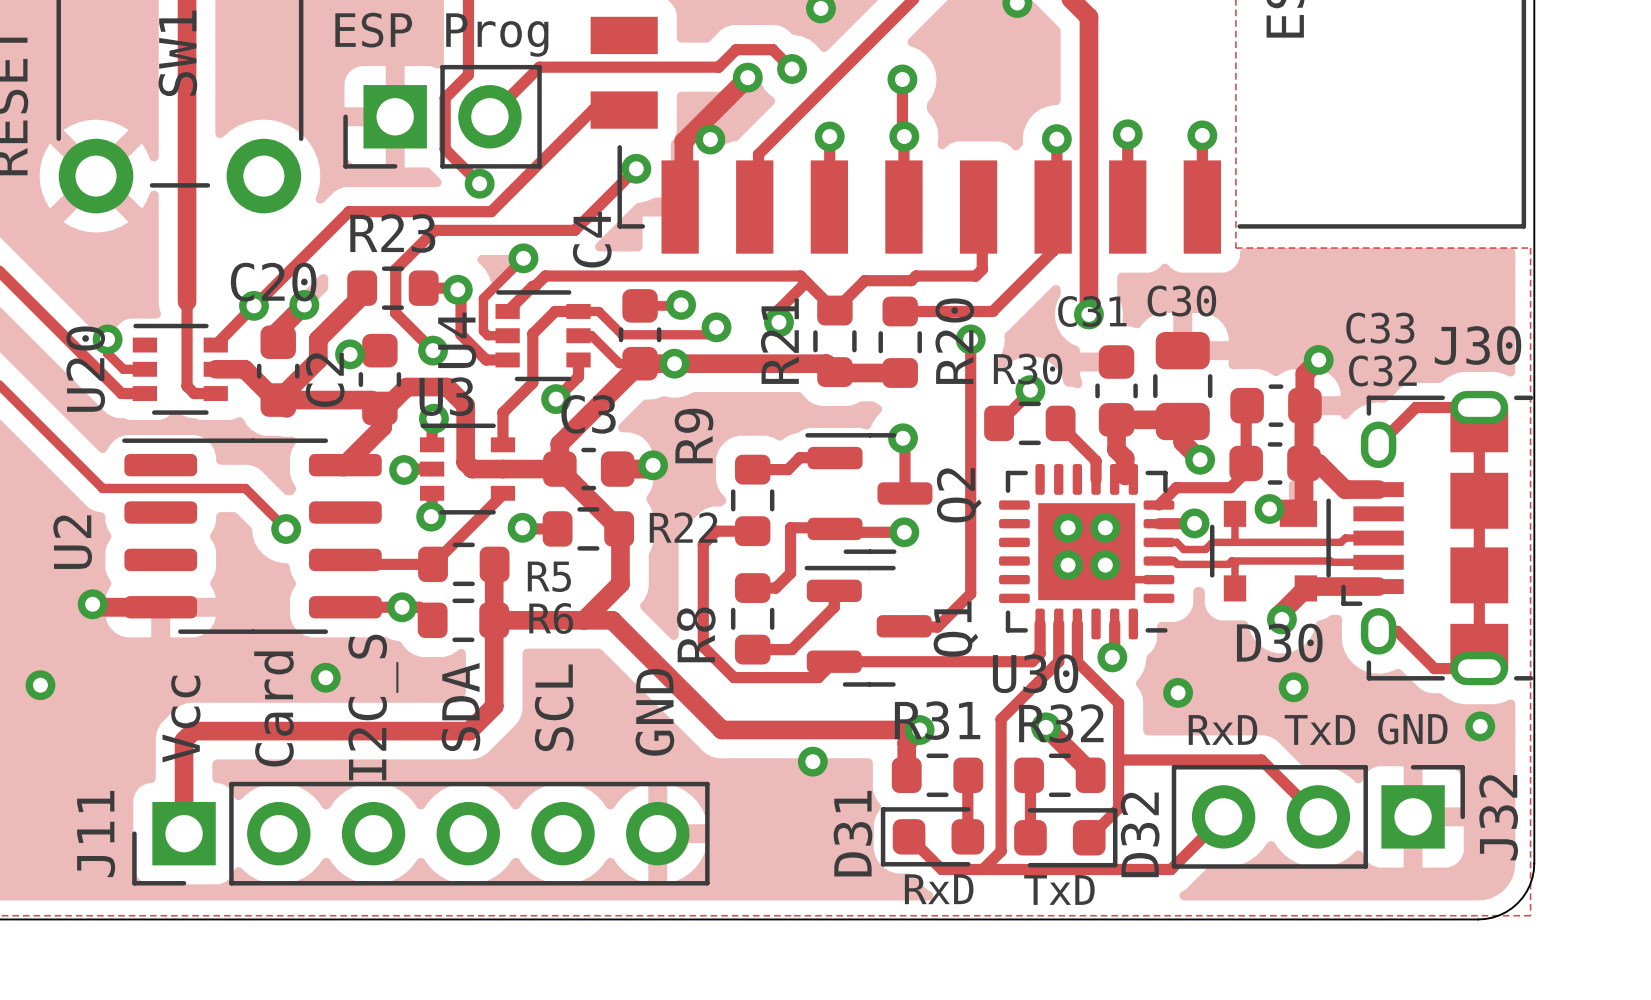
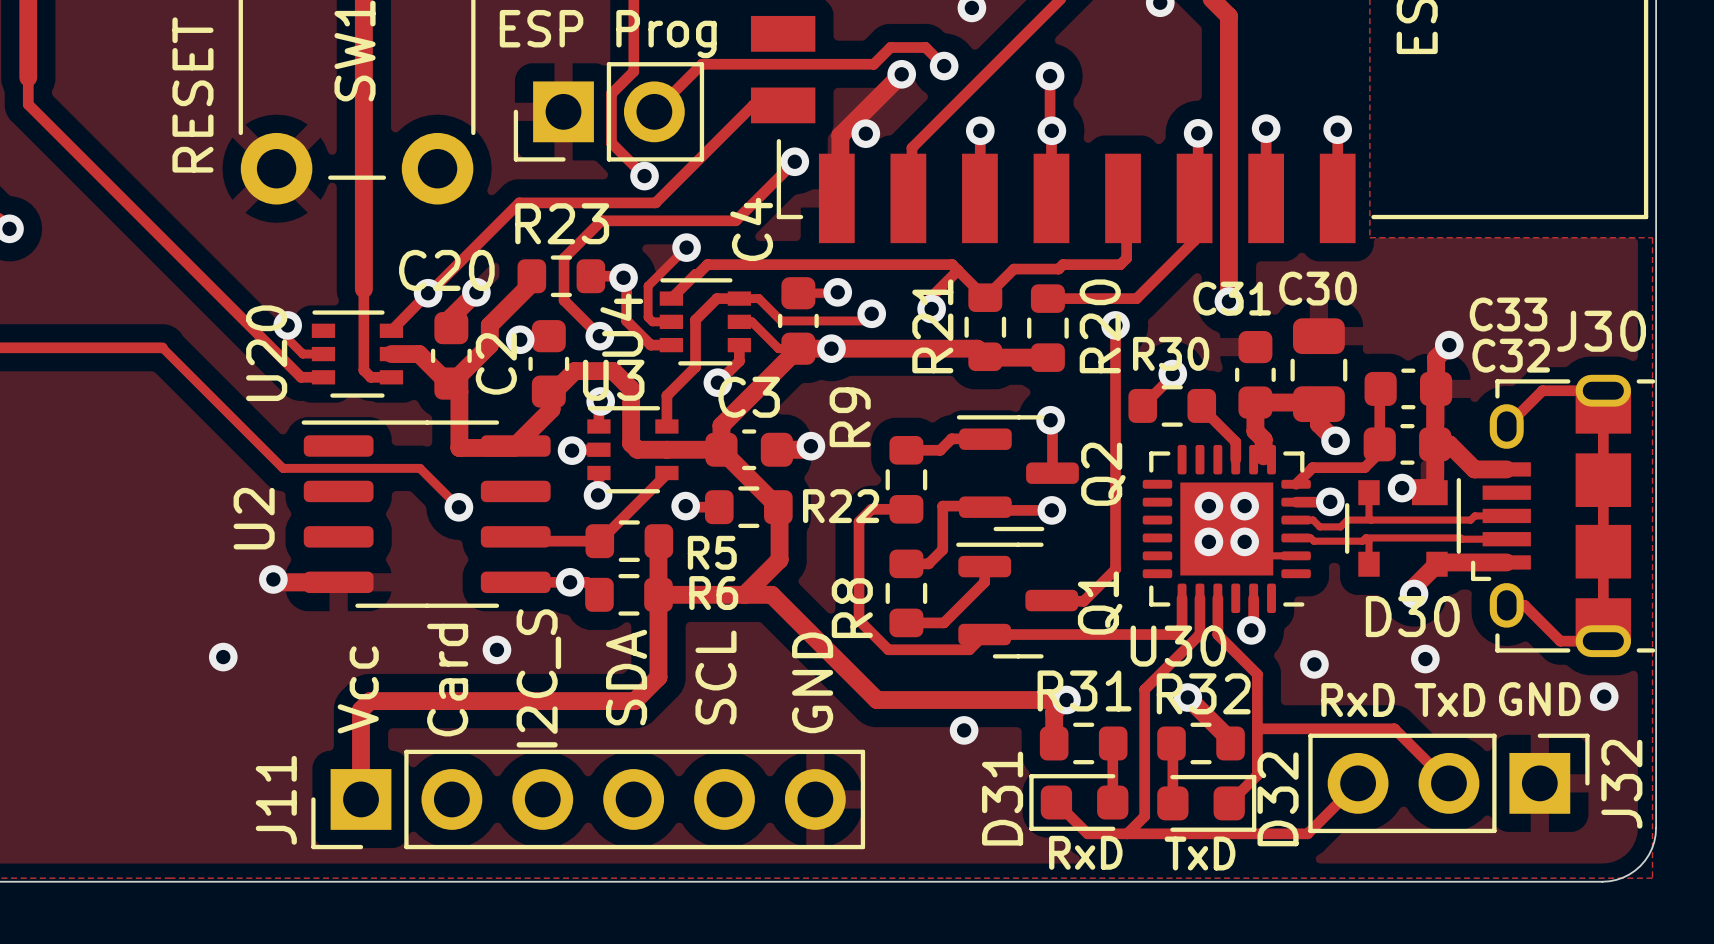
track: (278, 400) (371, 400) (379, 408) -> none
track: none -> (459, 391) (459, 447) (513, 447)

